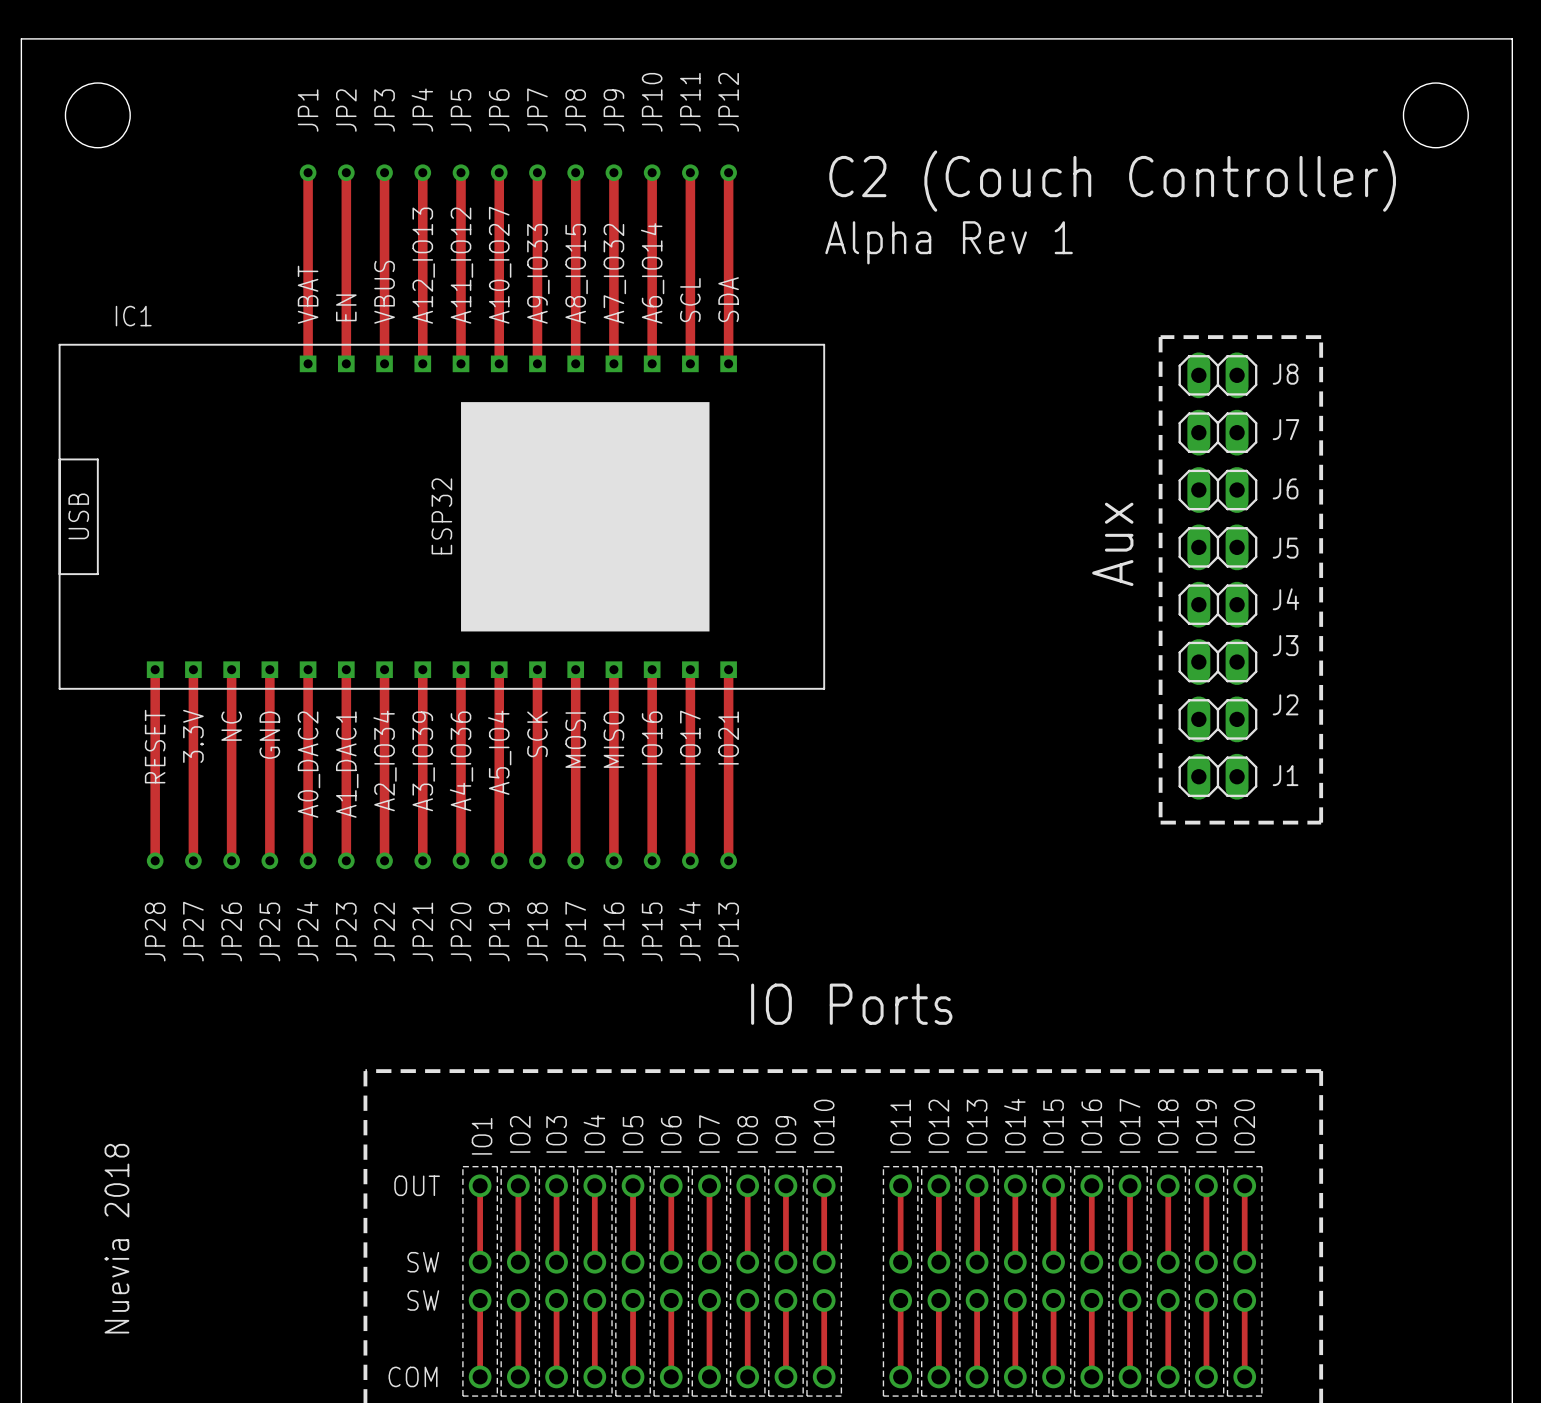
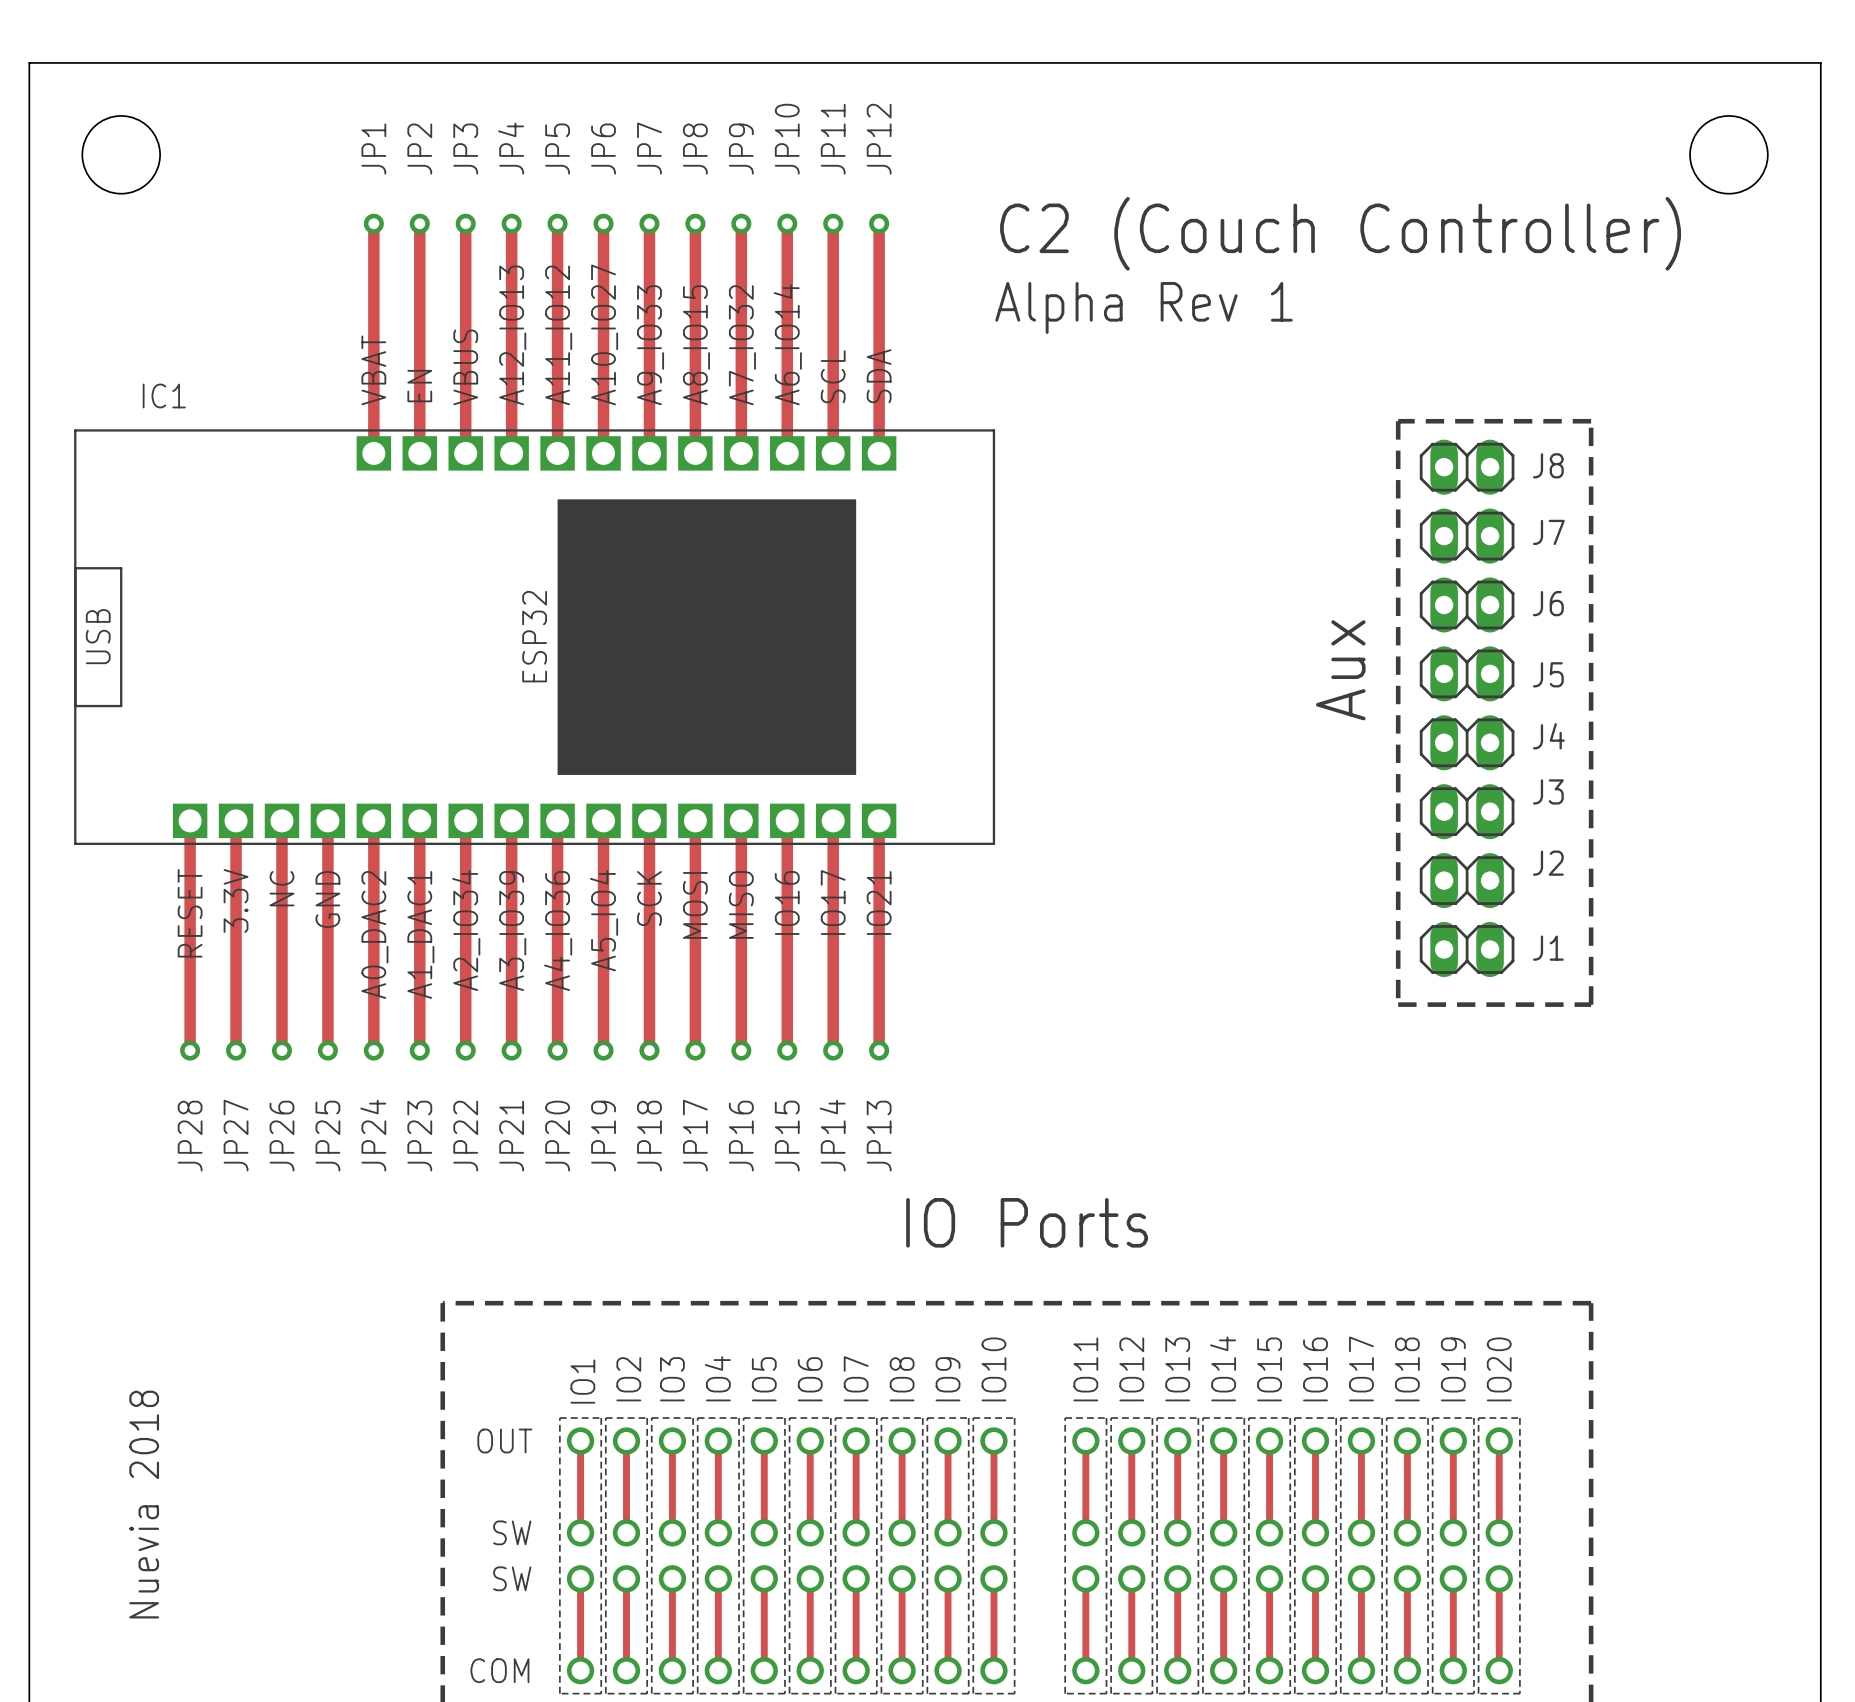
IC1 footprint: [58, 343, 826, 690] -> [74, 429, 996, 846]

